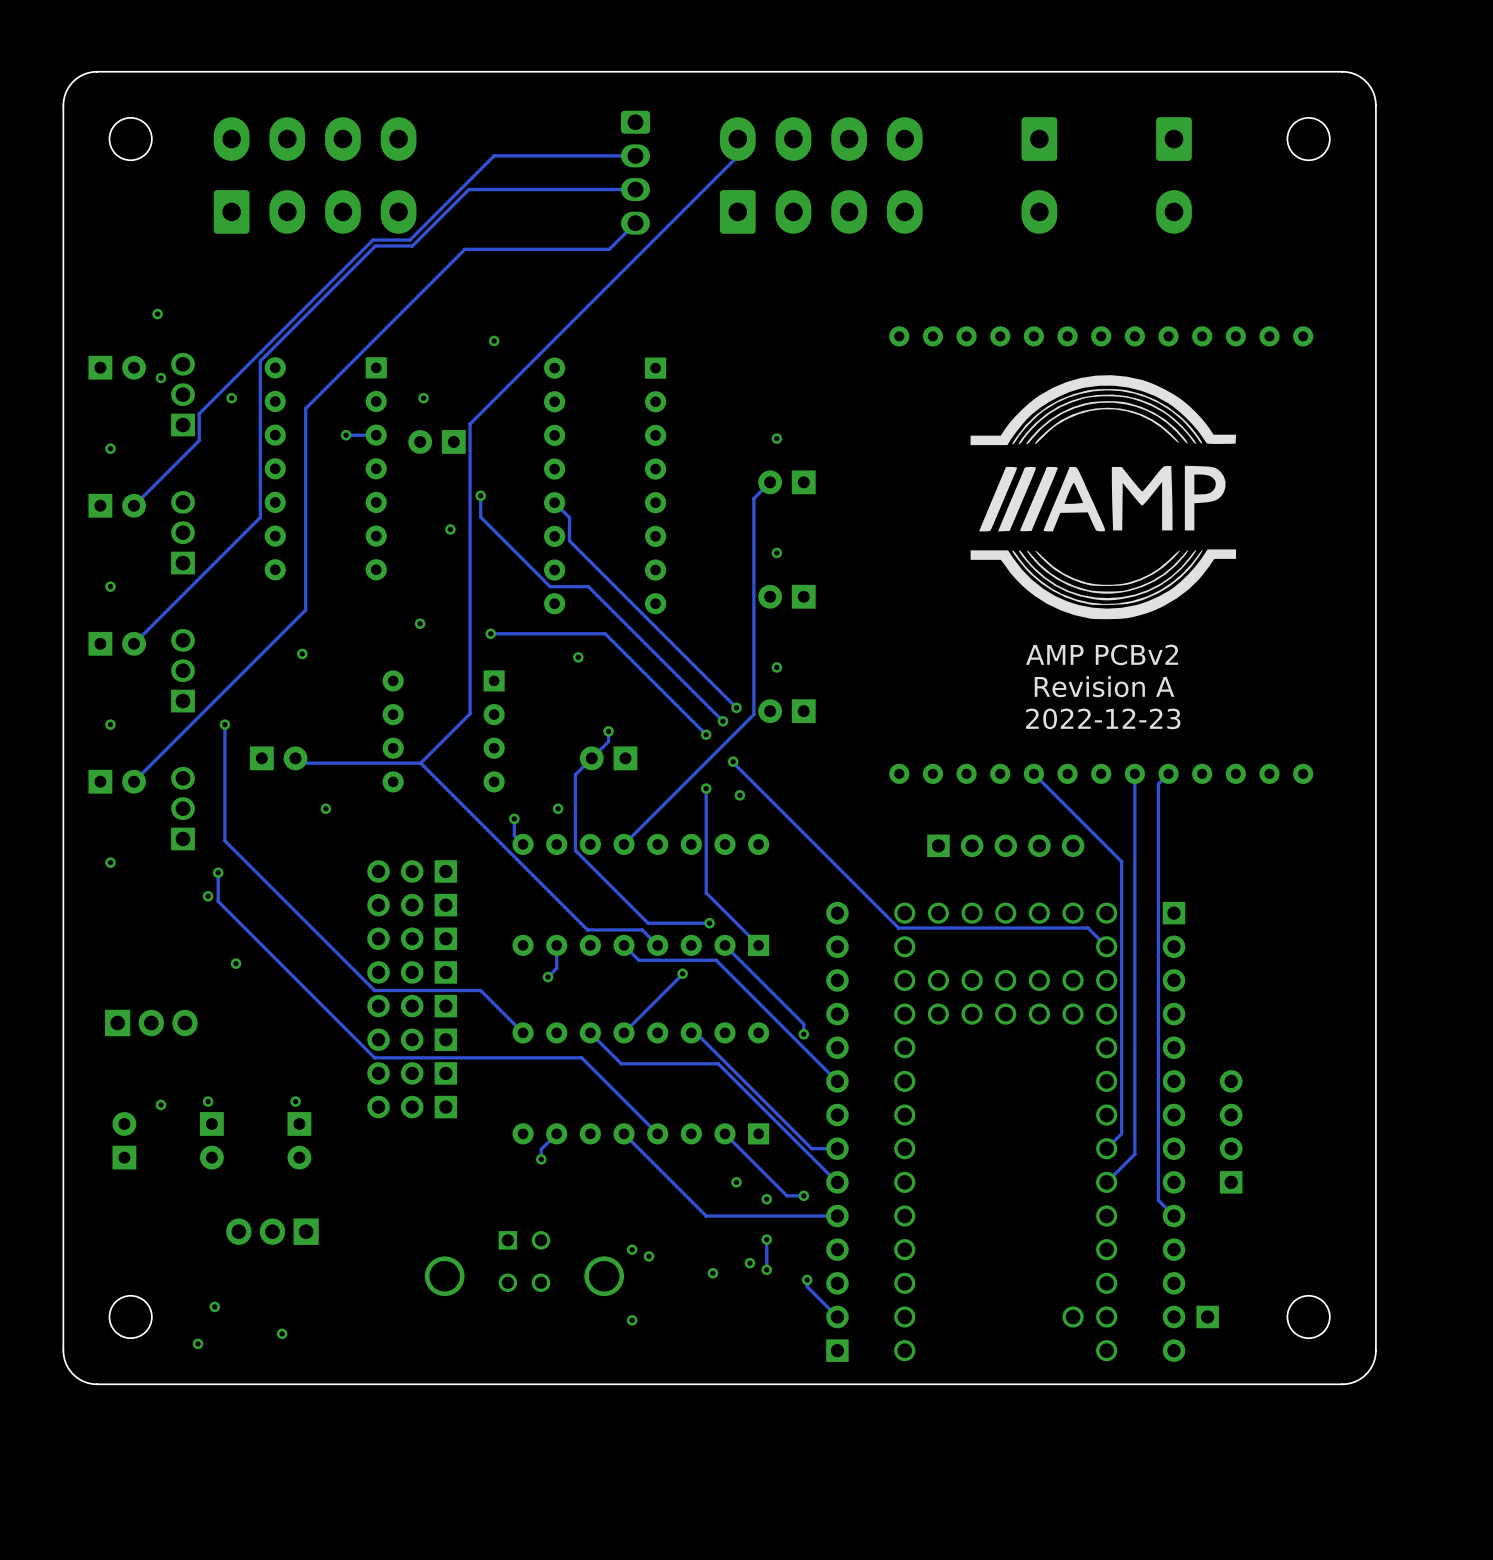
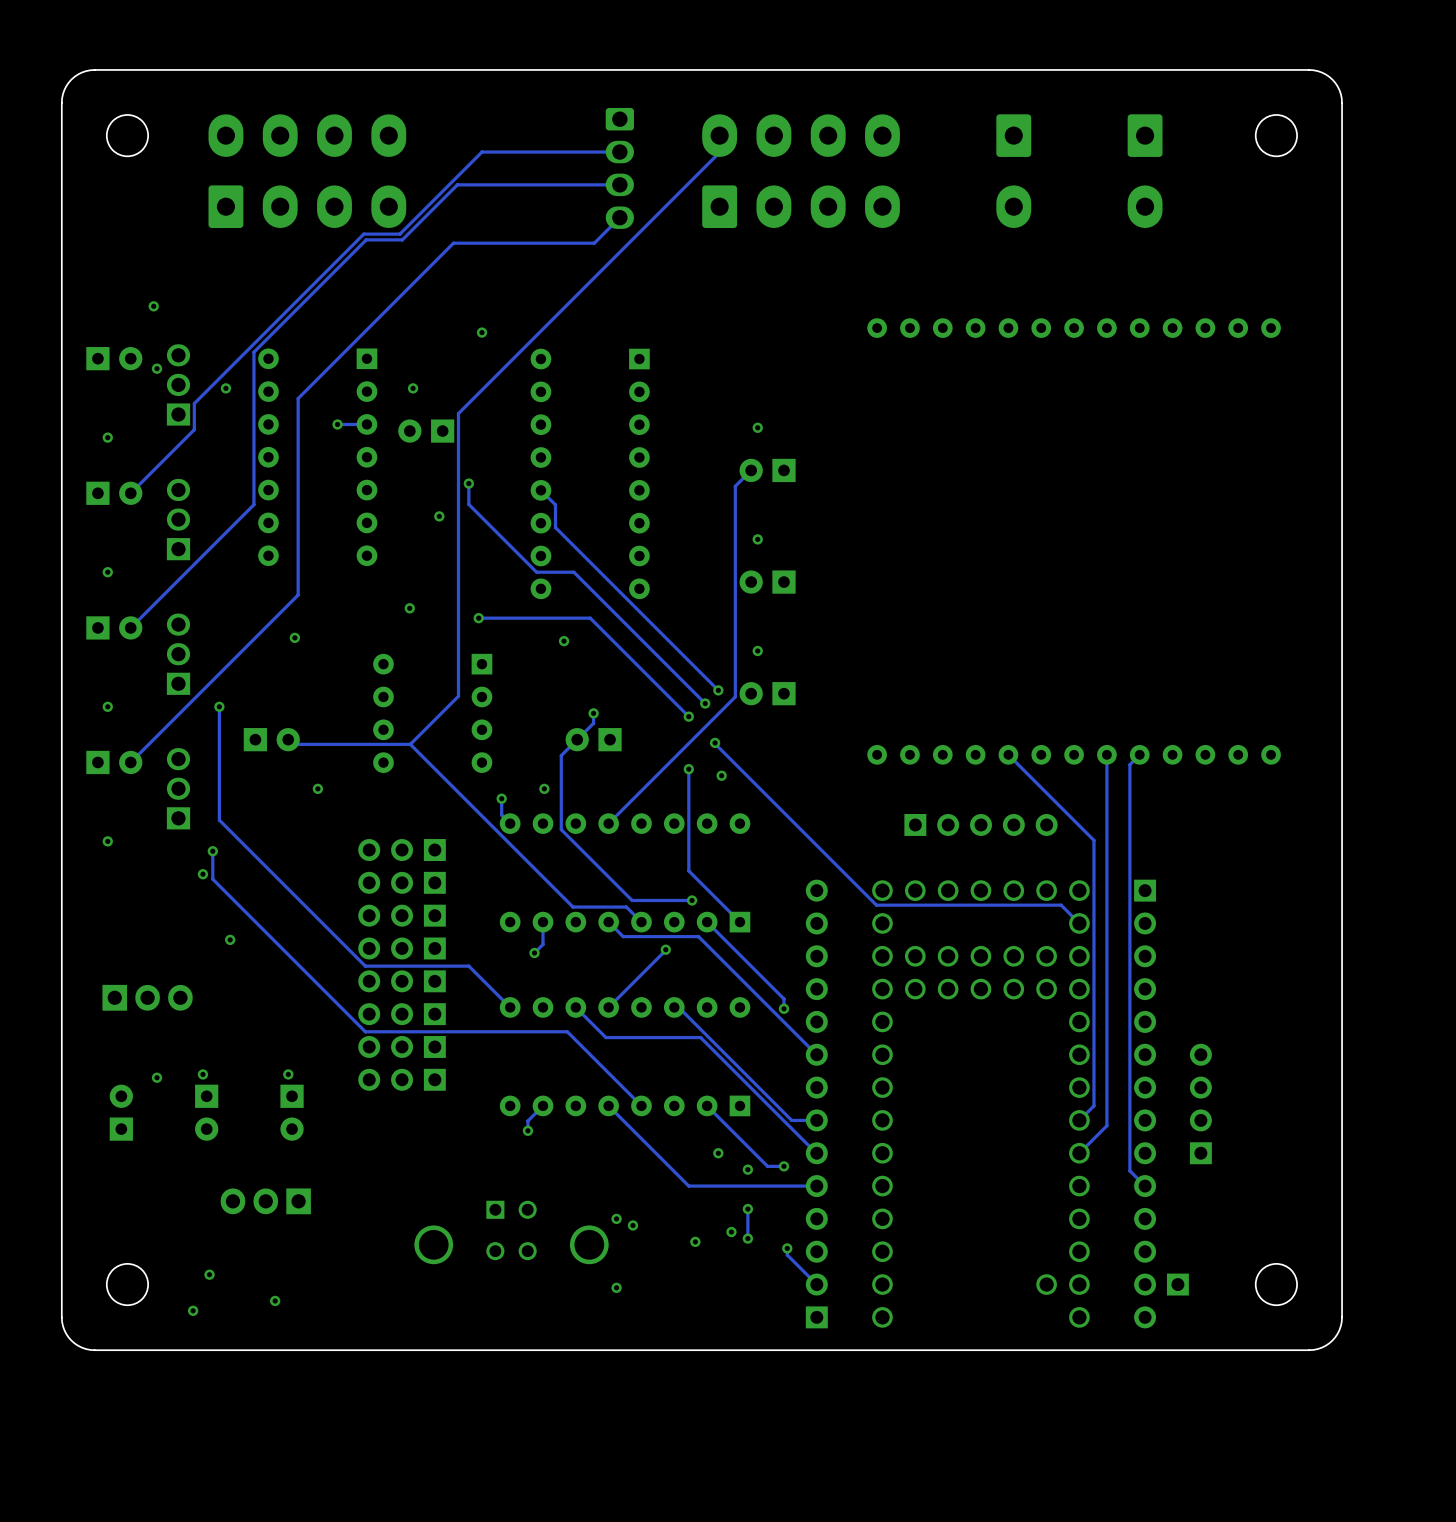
drawing: [970, 375, 1237, 620] -> none
text: AMP PCBv2 (1102, 654) -> none
text: Revision A (1104, 686) -> none
text: 2022-12-23 (1103, 718) -> none

